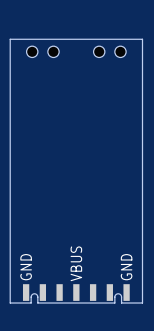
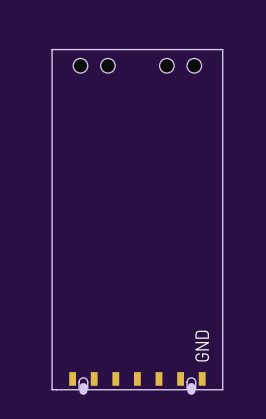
text: VBUS (76, 263) -> none
text: GND (26, 267) -> none
part footprint: [22, 284, 130, 301] -> [69, 372, 206, 395]

